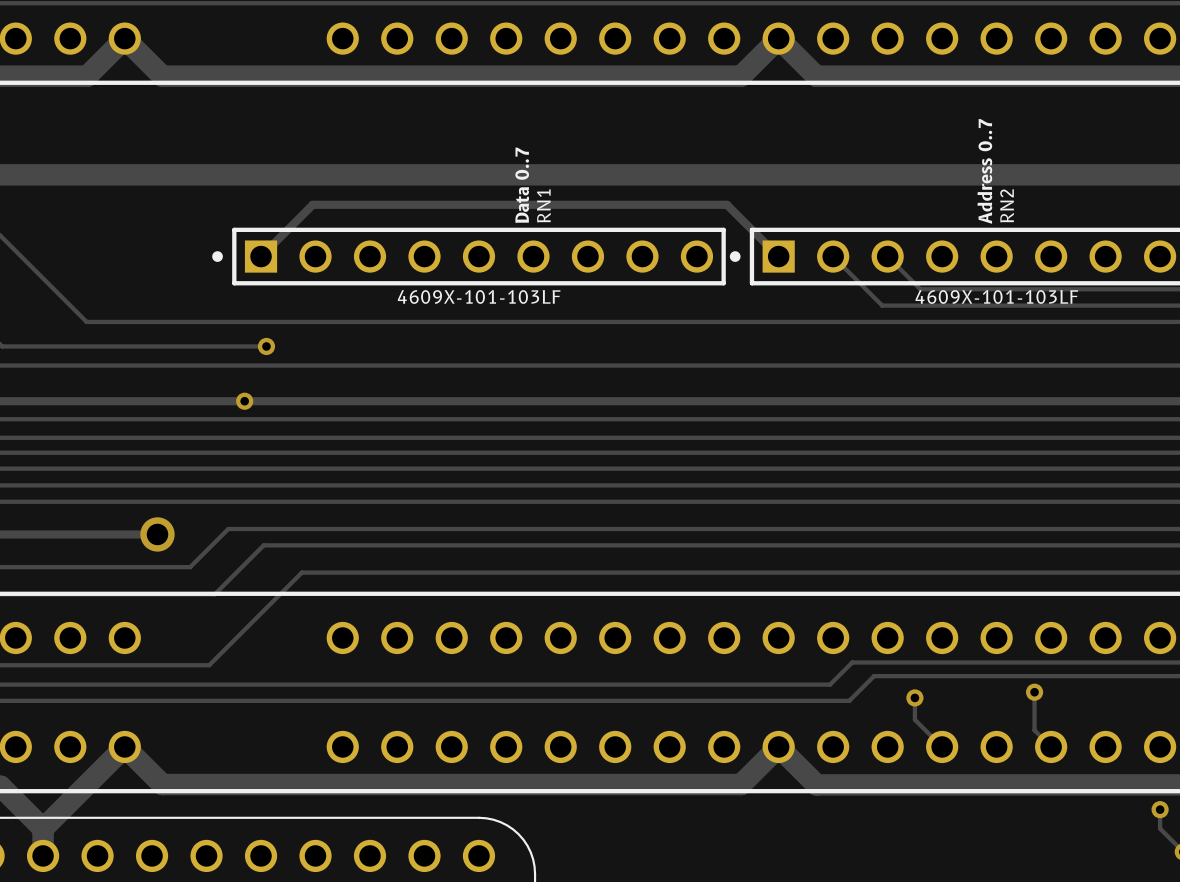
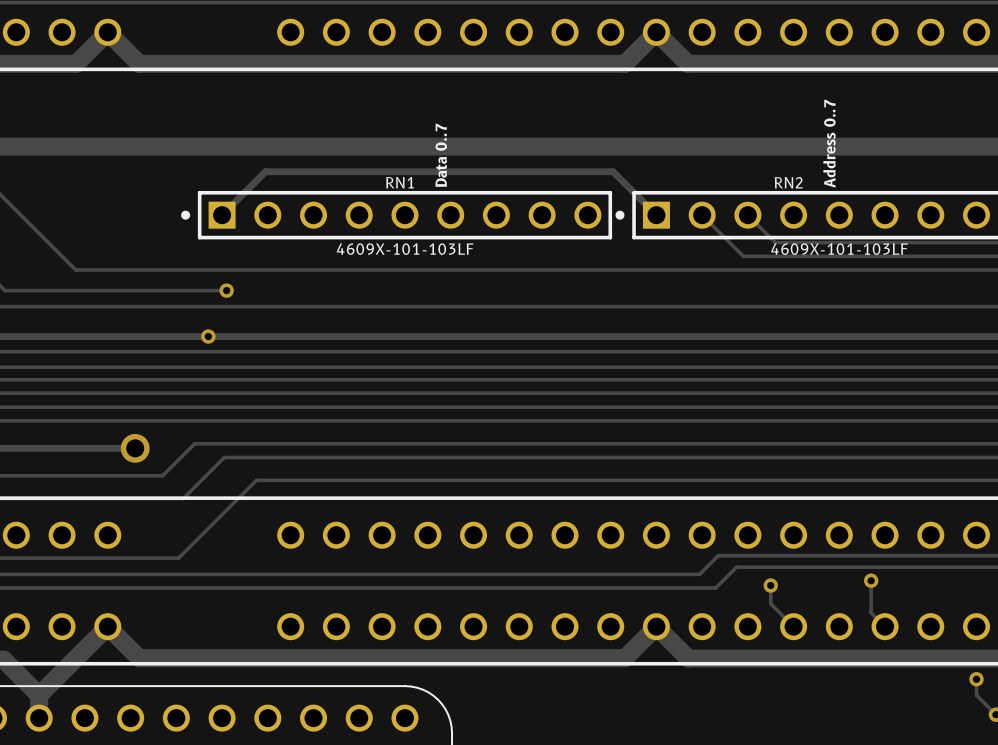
RN1 name rotation: 0° (543, 205) -> 90° clockwise (400, 182)
RN1 name position: RN1 (543, 205) -> RN1 (400, 182)
RN2 name rotation: 0° (1007, 205) -> 90° clockwise (788, 182)
RN2 name position: RN2 (1007, 205) -> RN2 (788, 182)

